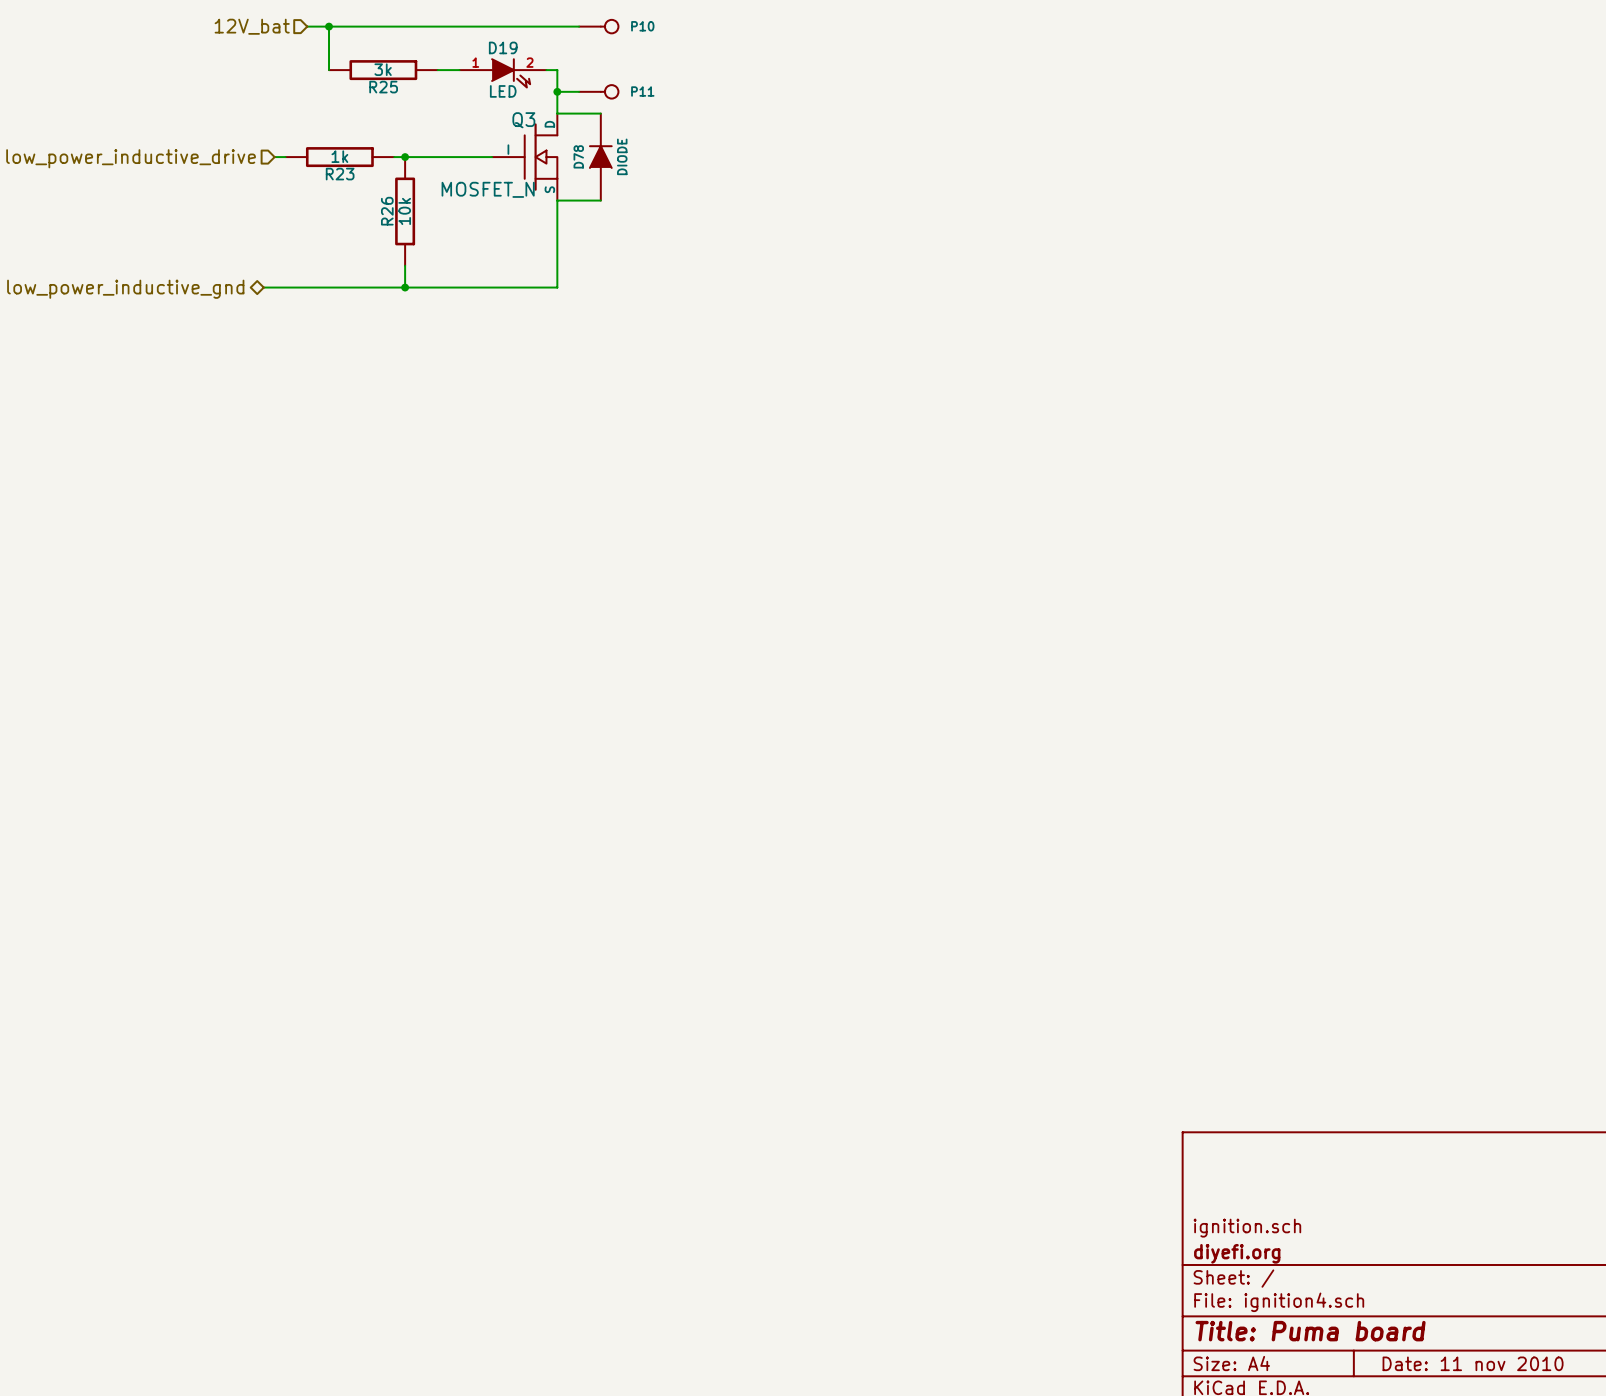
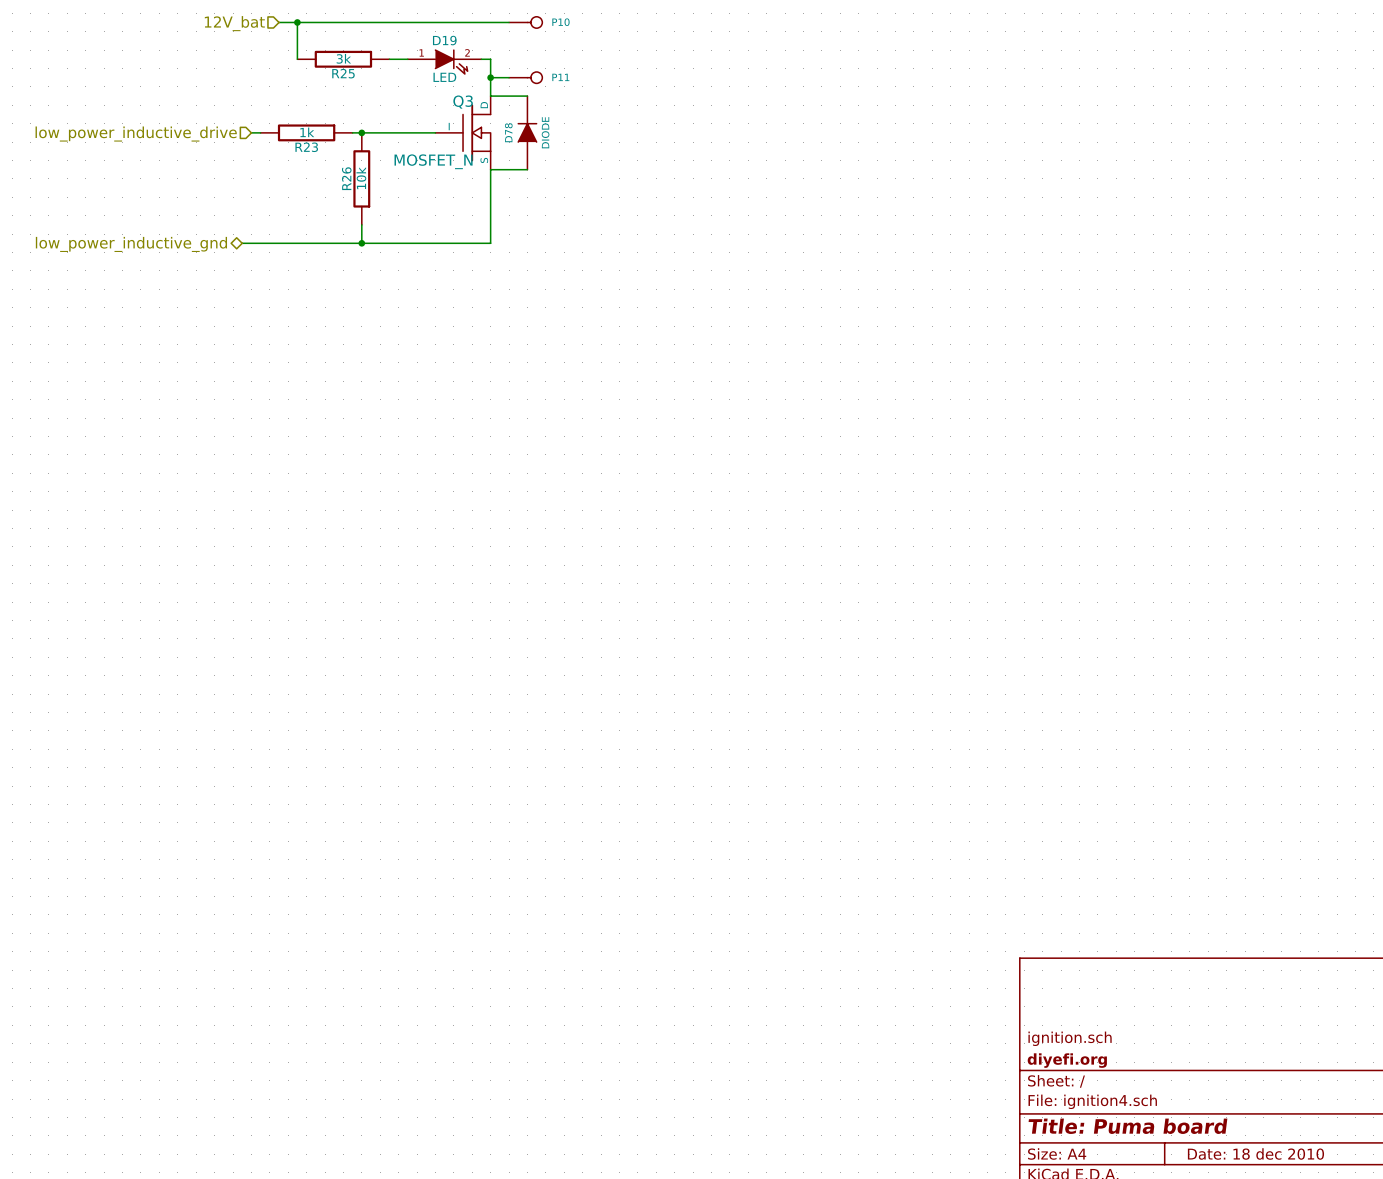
title block: Date: 11 nov 2010 (1473, 1363) -> Date: 18 dec 2010 (1255, 1153)

